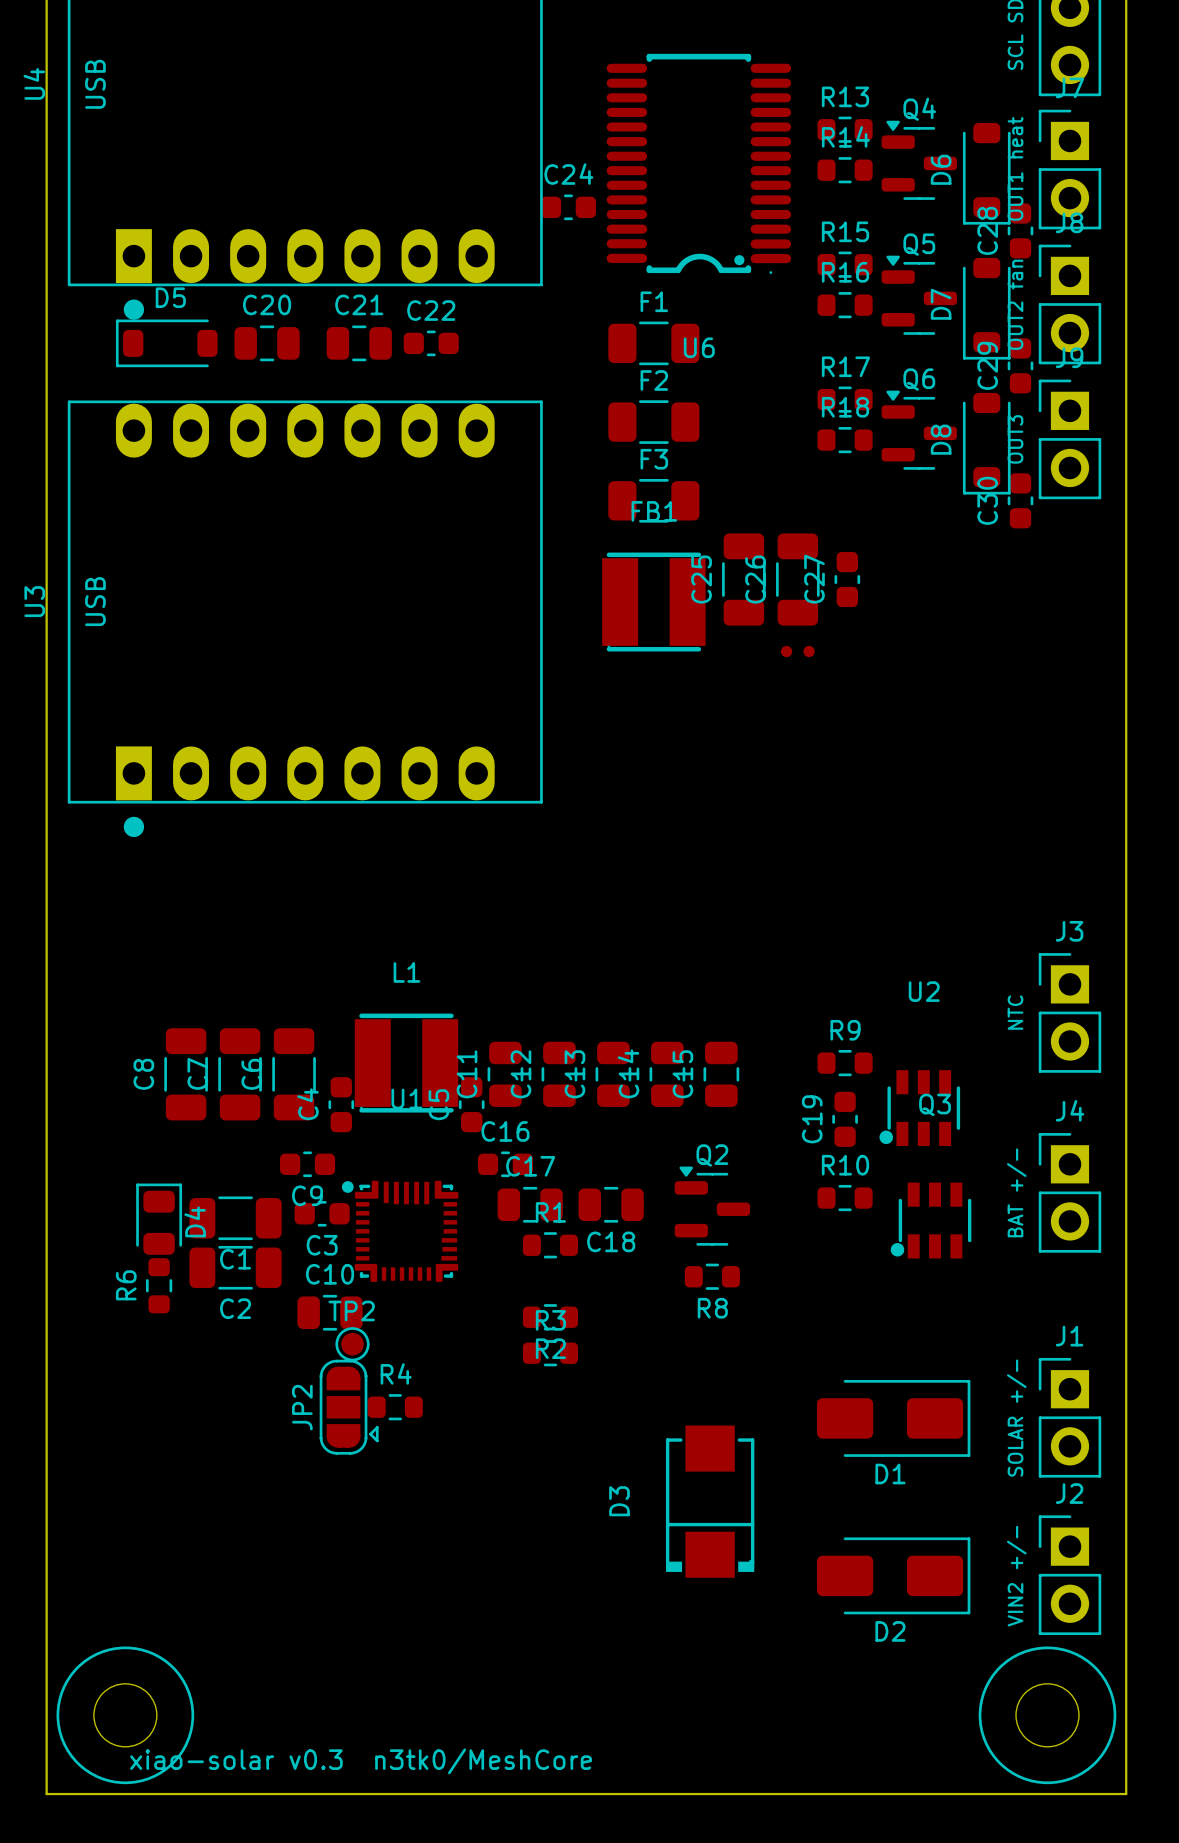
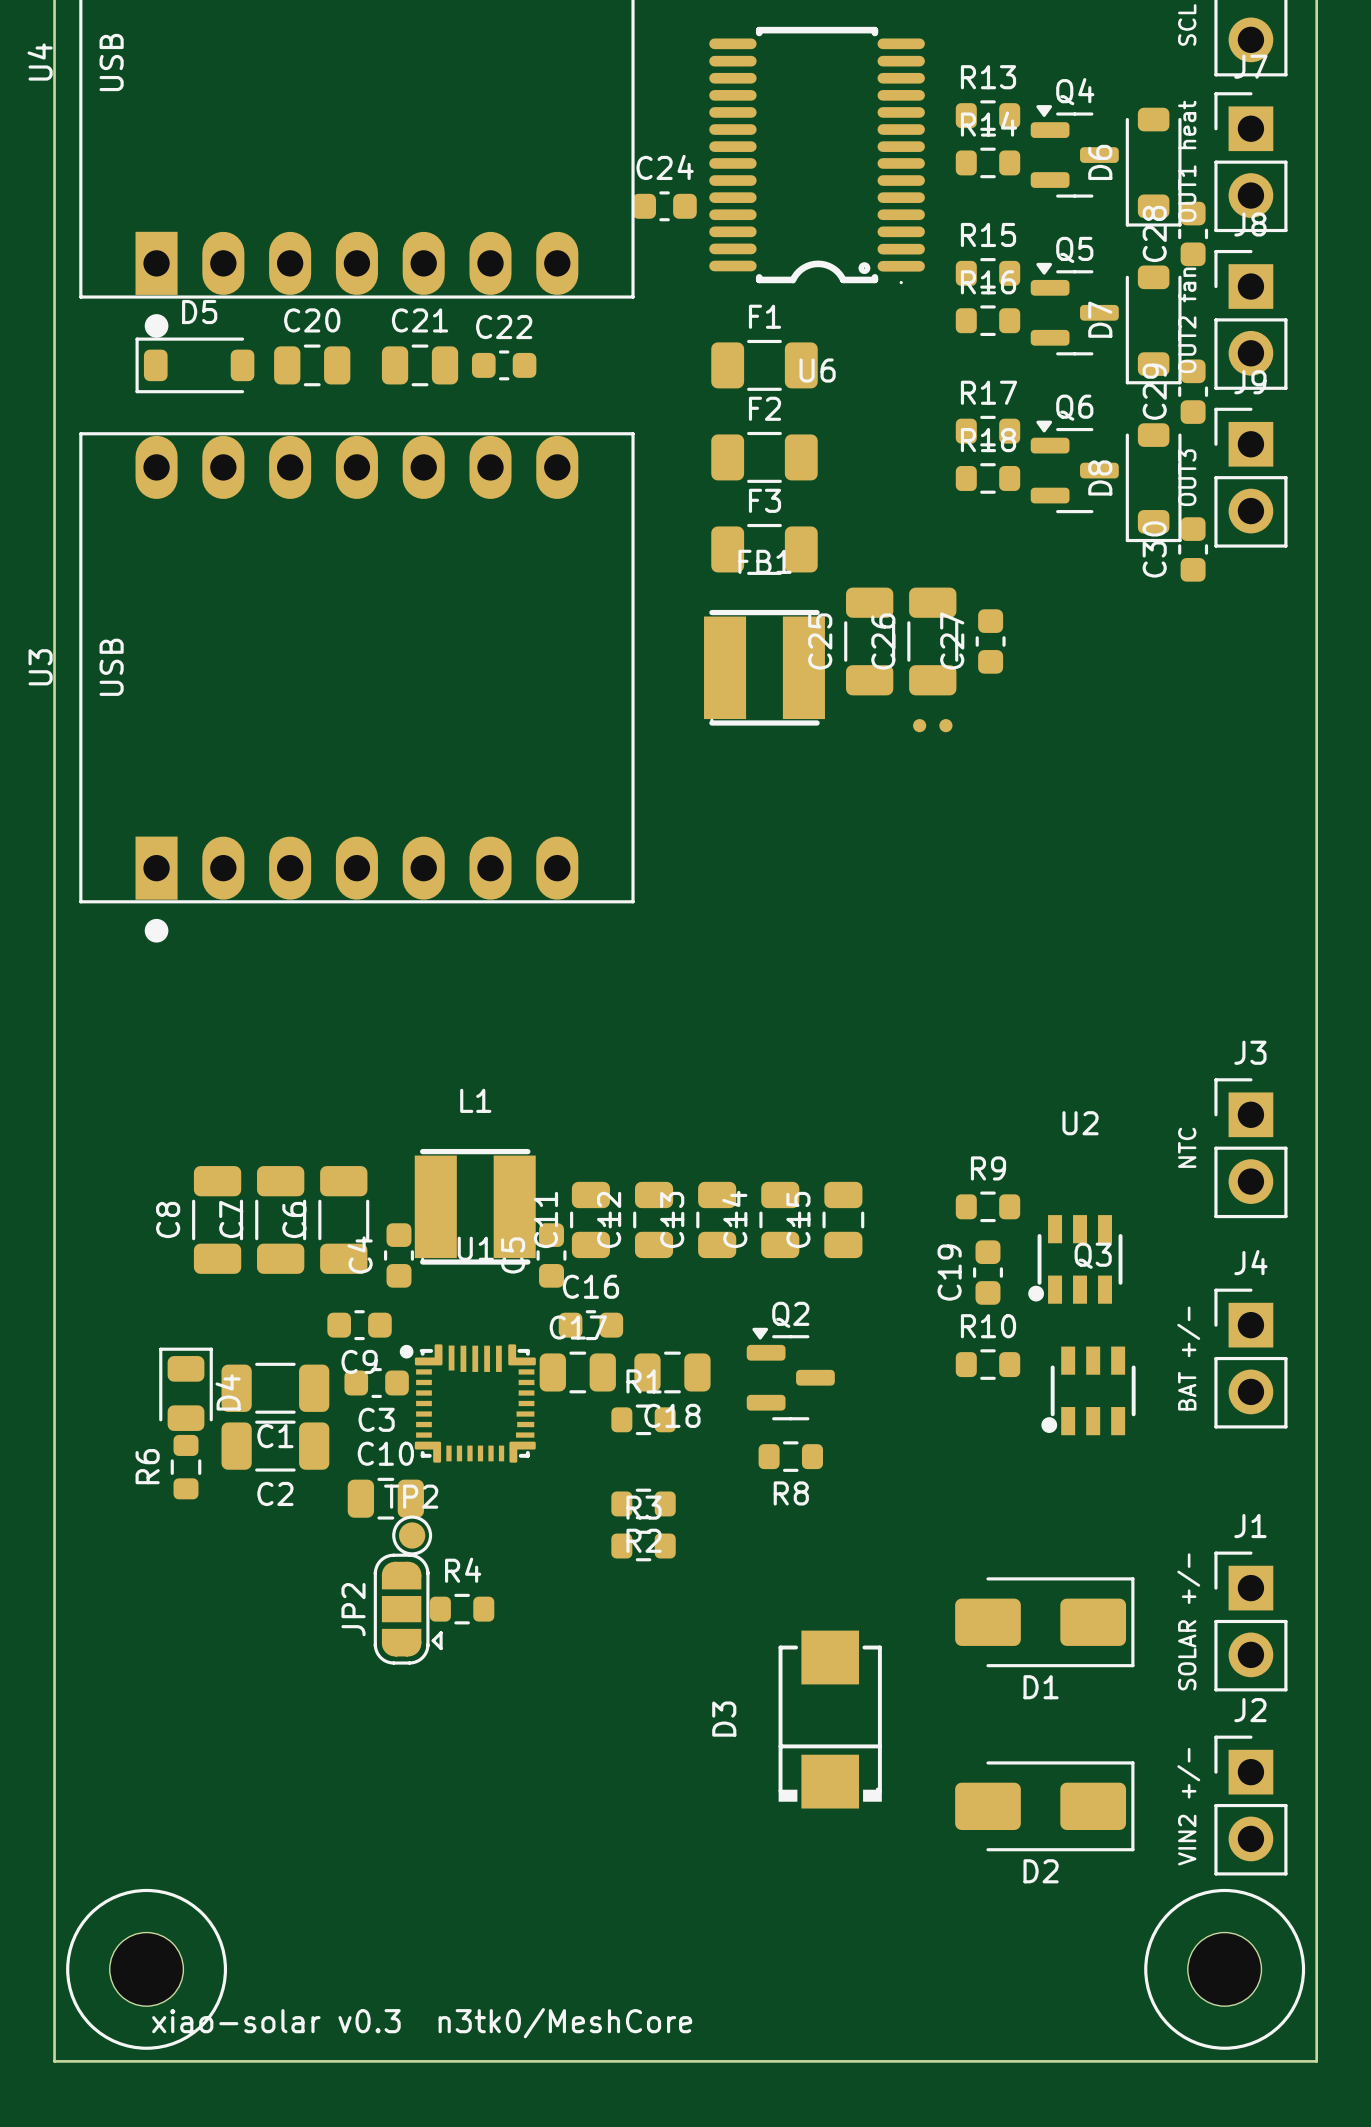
C17 position: (530, 1204) -> (577, 1372)
C18 position: (611, 1204) -> (672, 1372)
Q2 position: (712, 1206) -> (790, 1374)
R8 position: (712, 1276) -> (790, 1456)

